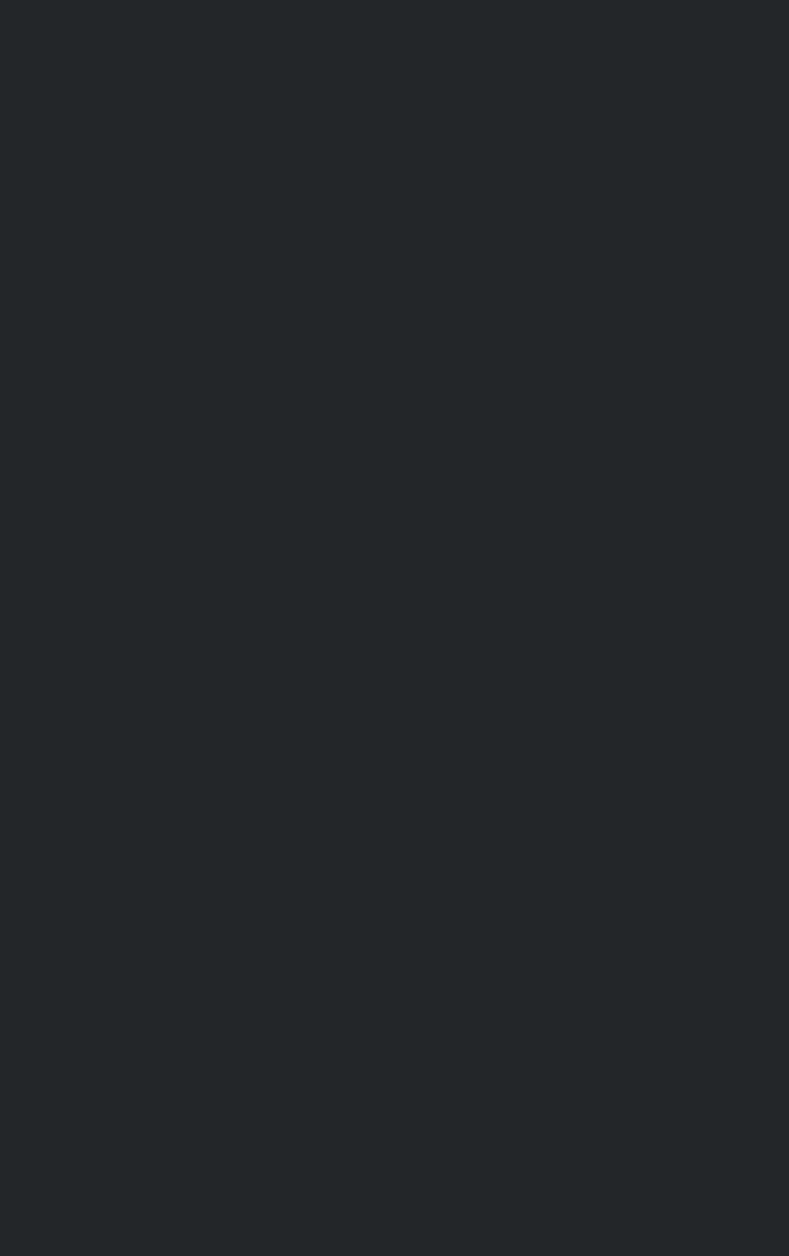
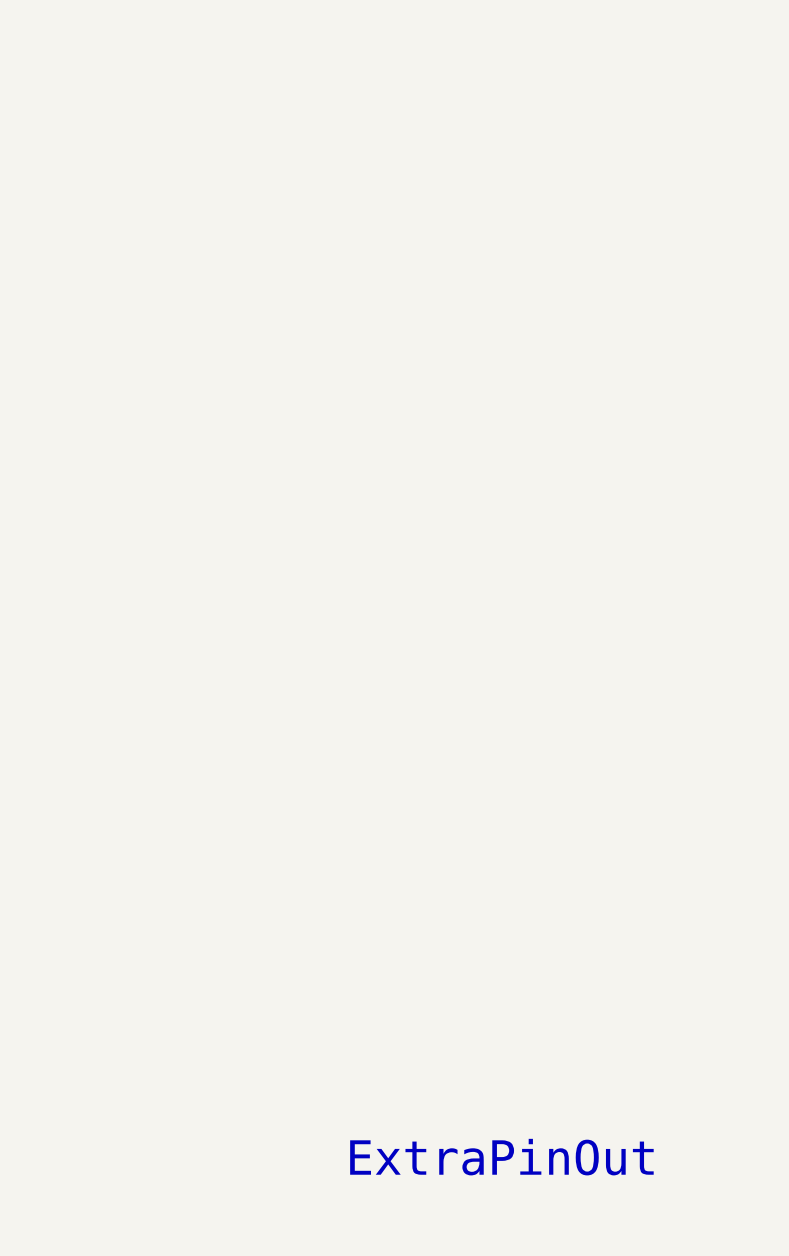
text: none -> ExtraPinOut (501, 1157)

